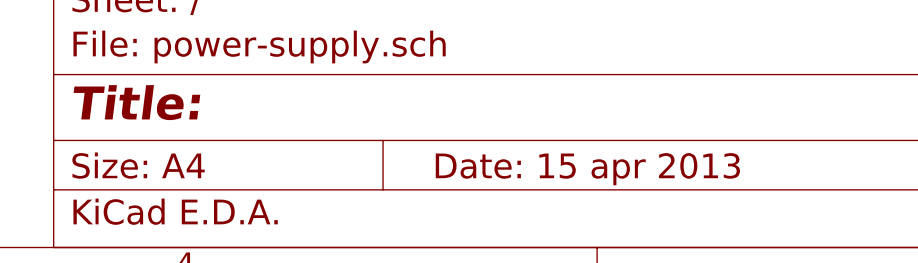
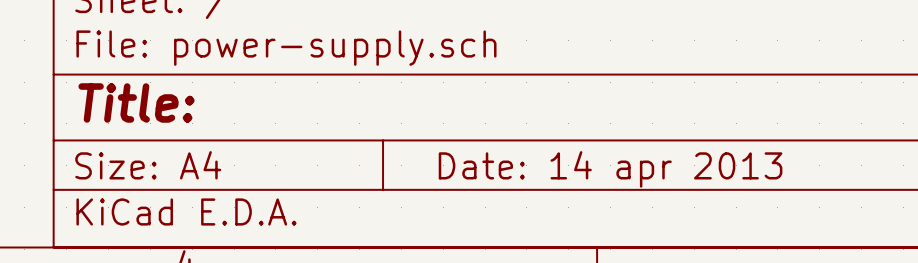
title block: Date: 15 apr 2013 (587, 169) -> Date: 14 apr 2013 (610, 169)

